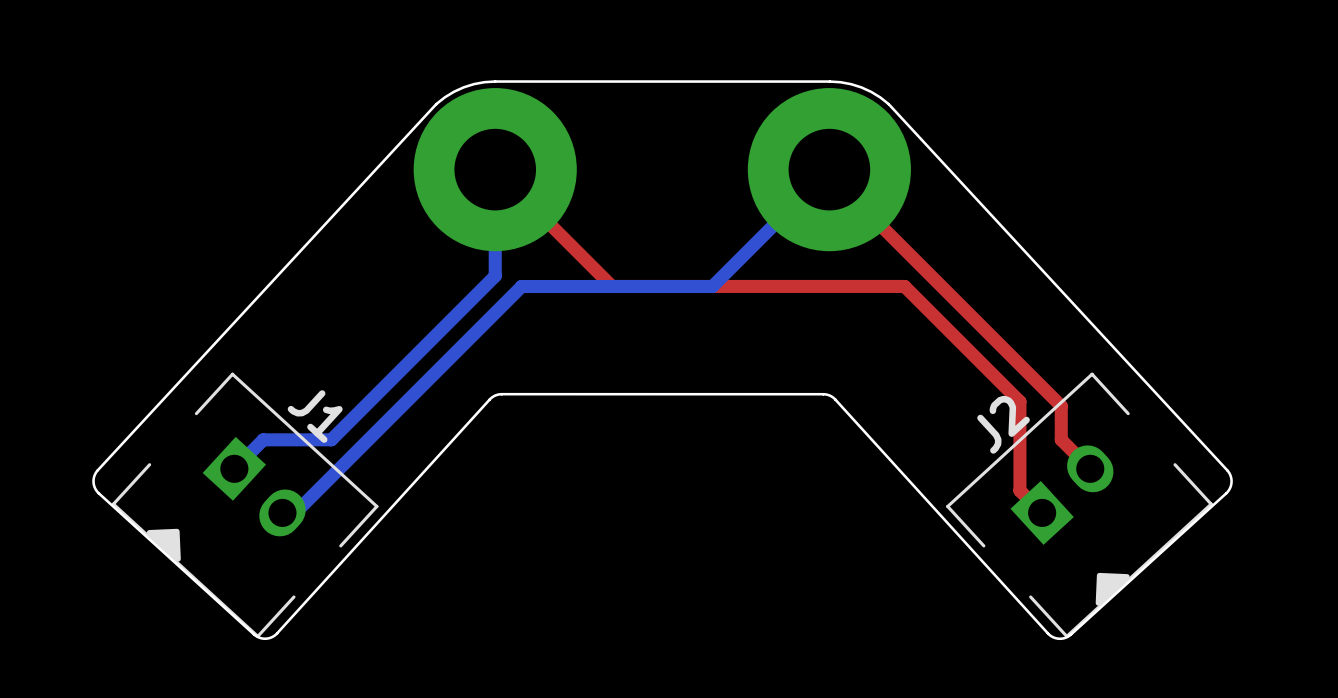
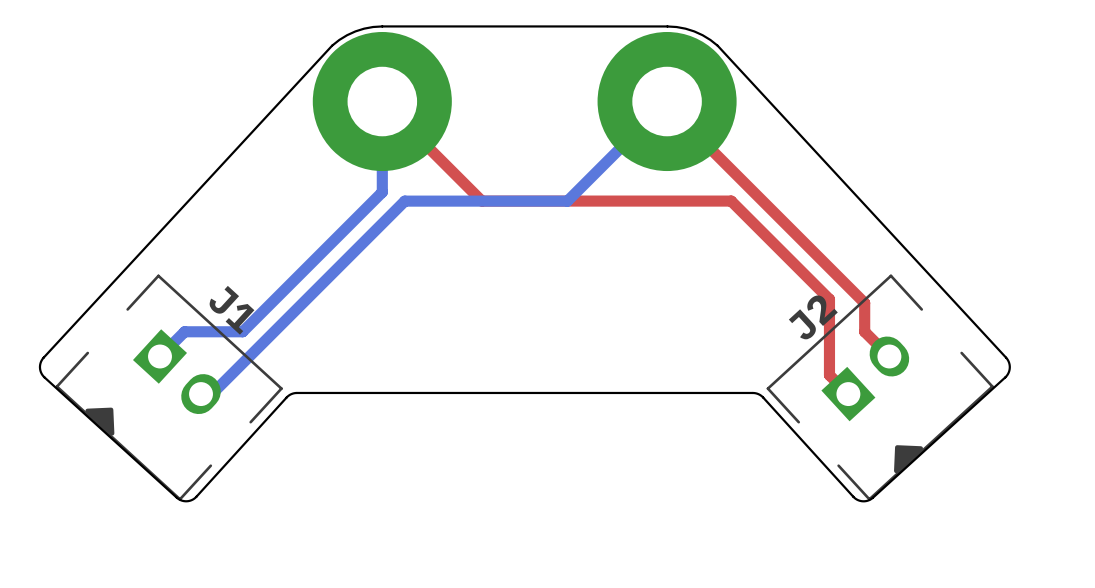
board edge: (1047, 633) (829, 395) (501, 394) (489, 399) (277, 633) -> (853, 496) (763, 397) (752, 392) (294, 393) (286, 397) (196, 496)

